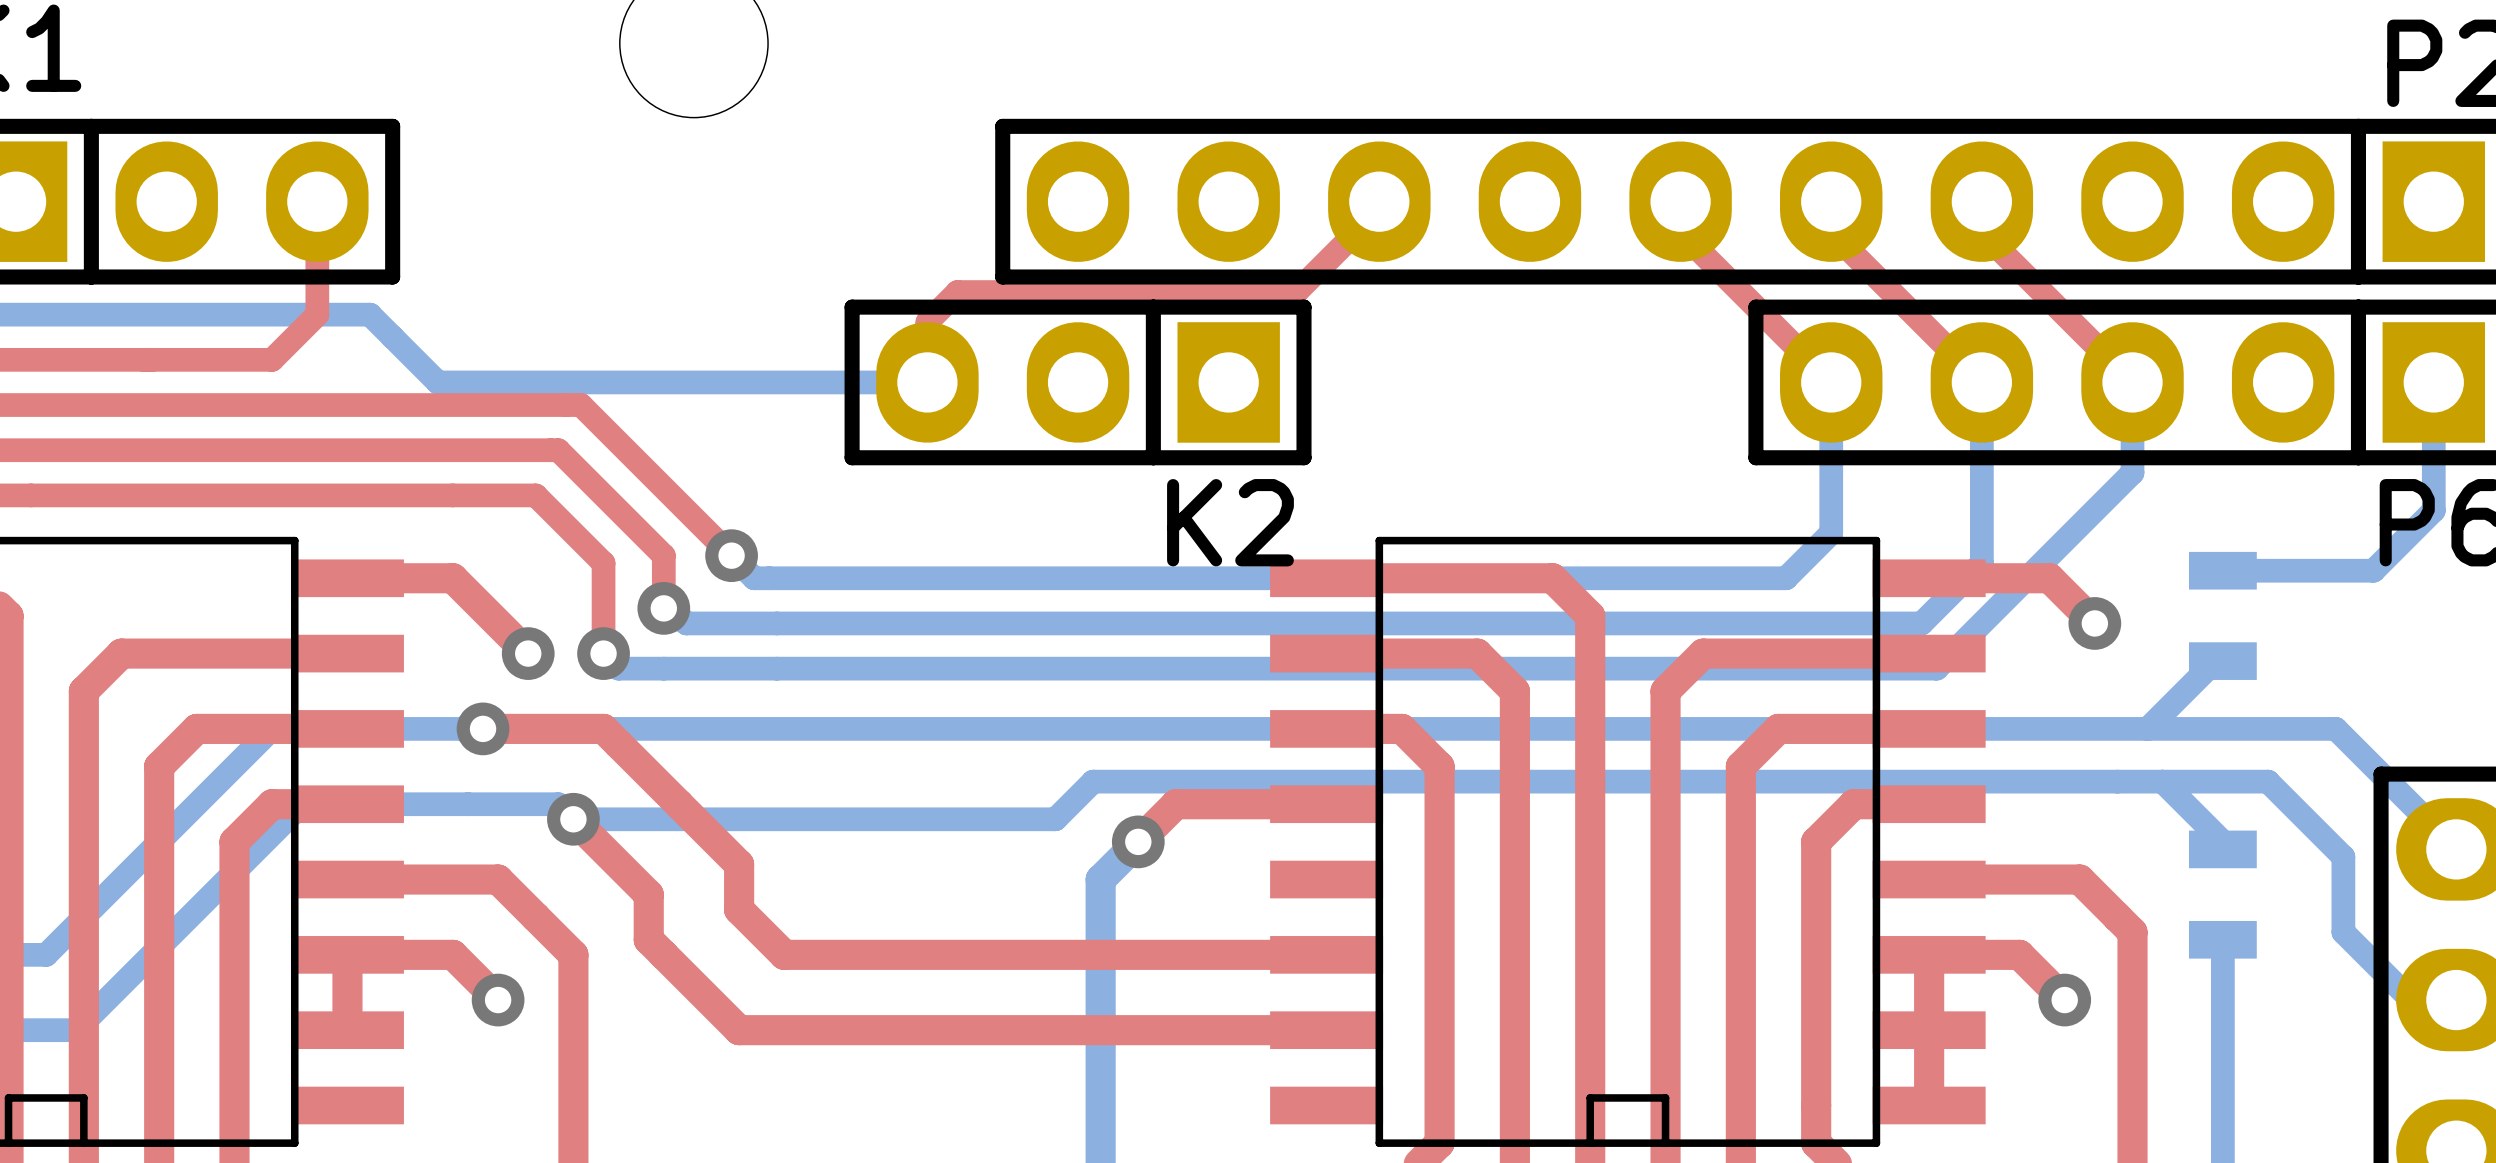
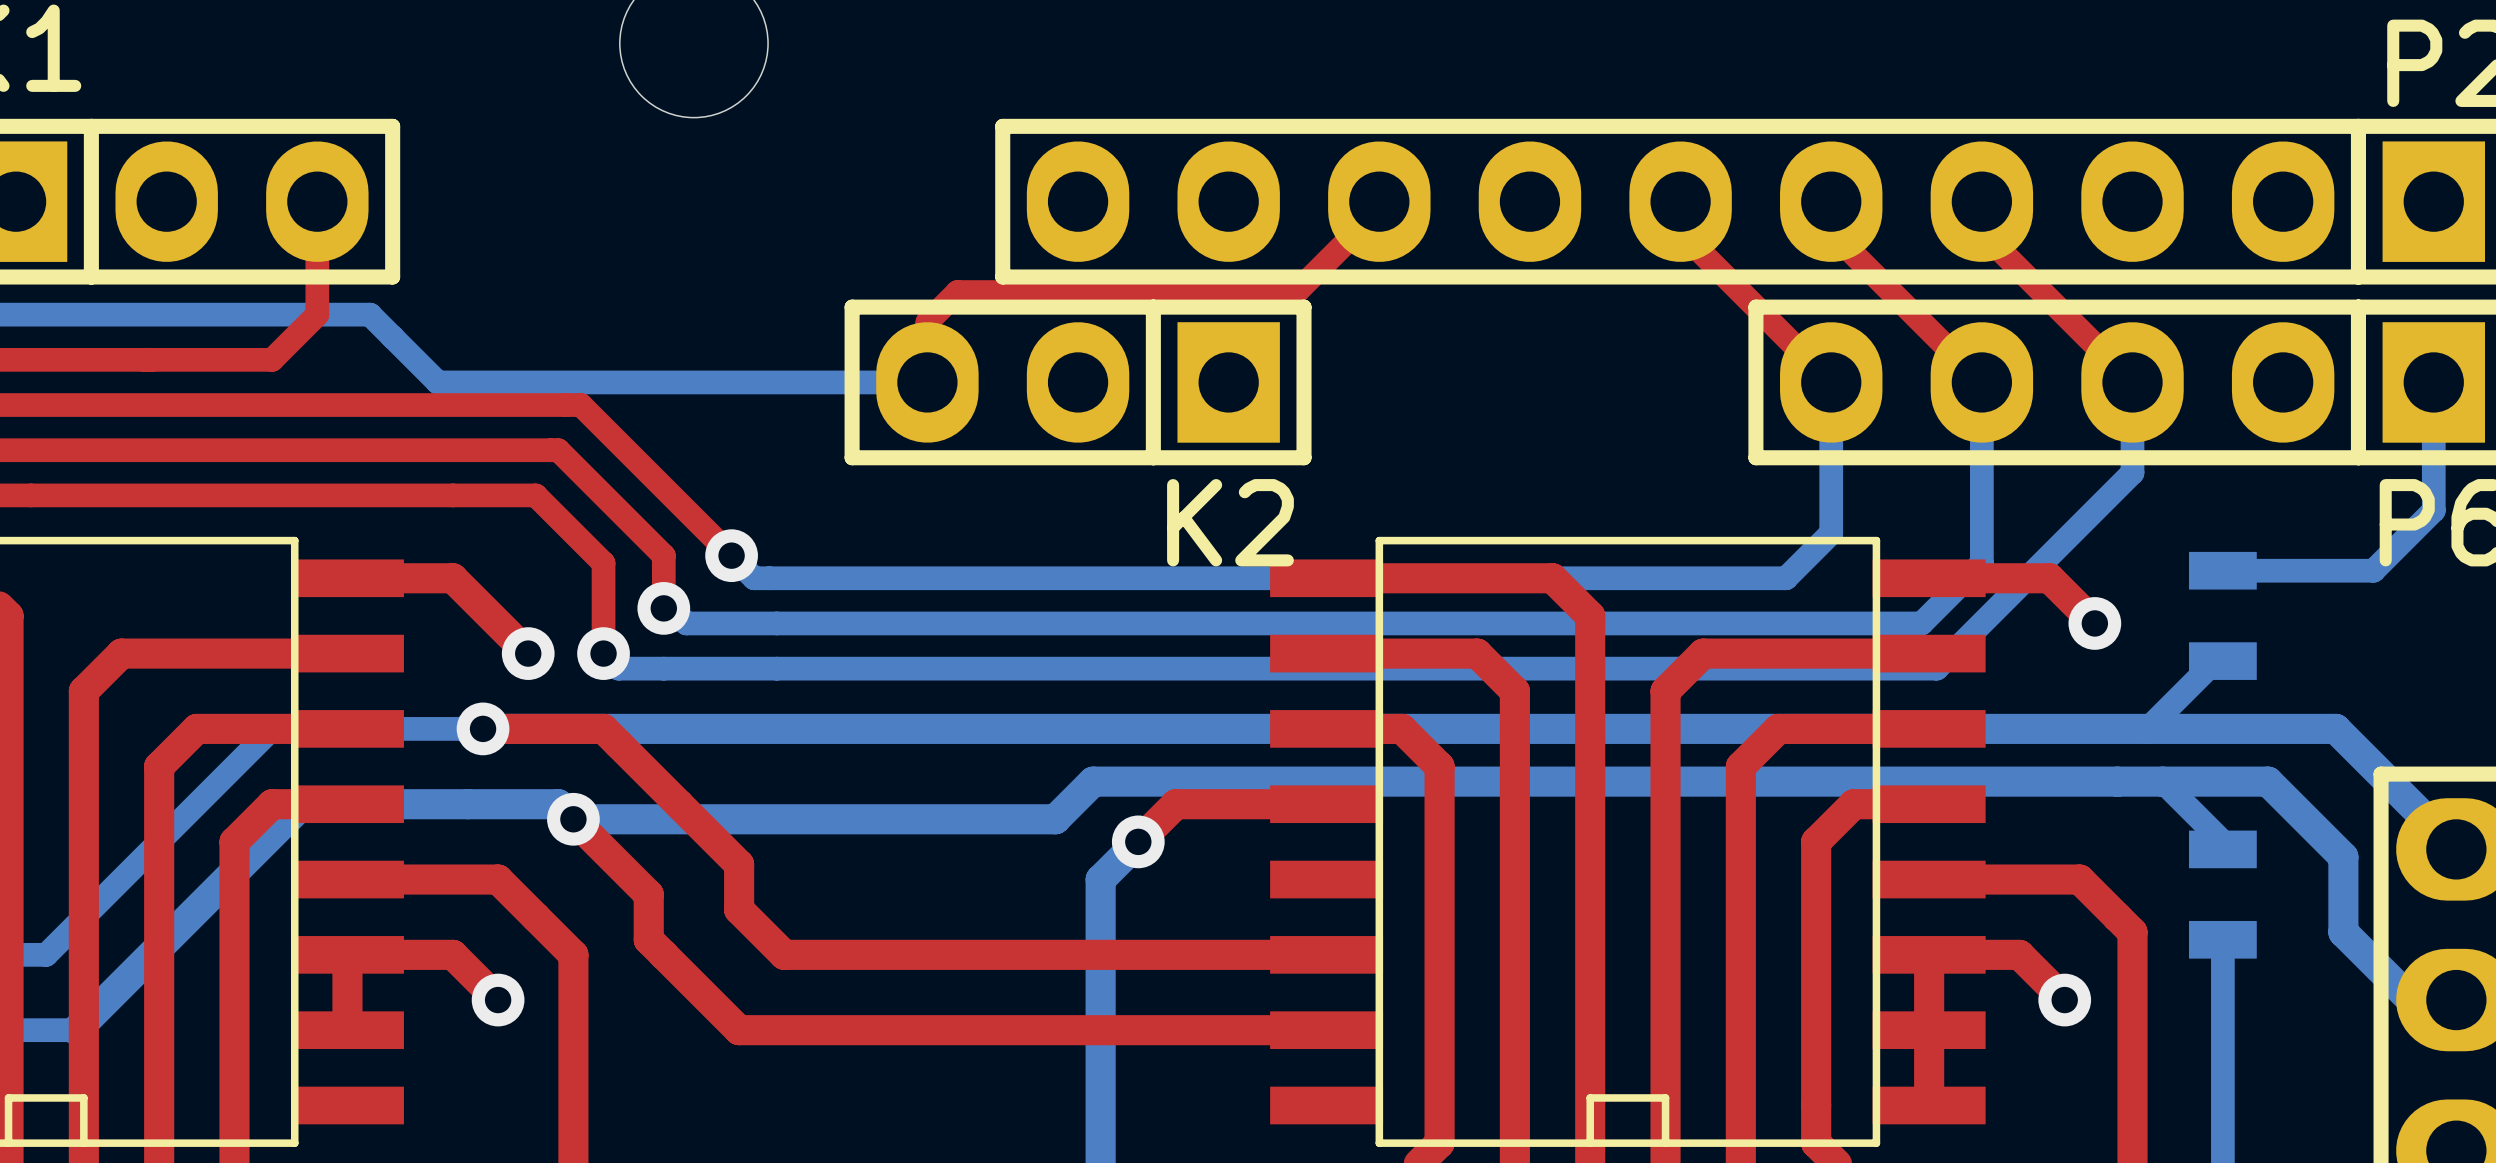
bottom track width: thin (483, 728) (2335, 728) (2456, 849) -> thick (483, 728) (2335, 728) (2456, 849)
bottom track width: thin (2456, 1000) (2411, 1000) (2343, 932) (2343, 856) (2268, 781) (1093, 781) (1055, 819) (573, 819) (558, 804) (302, 804) (76, 1030) -> thick (2456, 1000) (2411, 1000) (2343, 932) (2343, 856) (2268, 781) (1093, 781) (1055, 819) (573, 819) (558, 804) (302, 804) (76, 1030)

